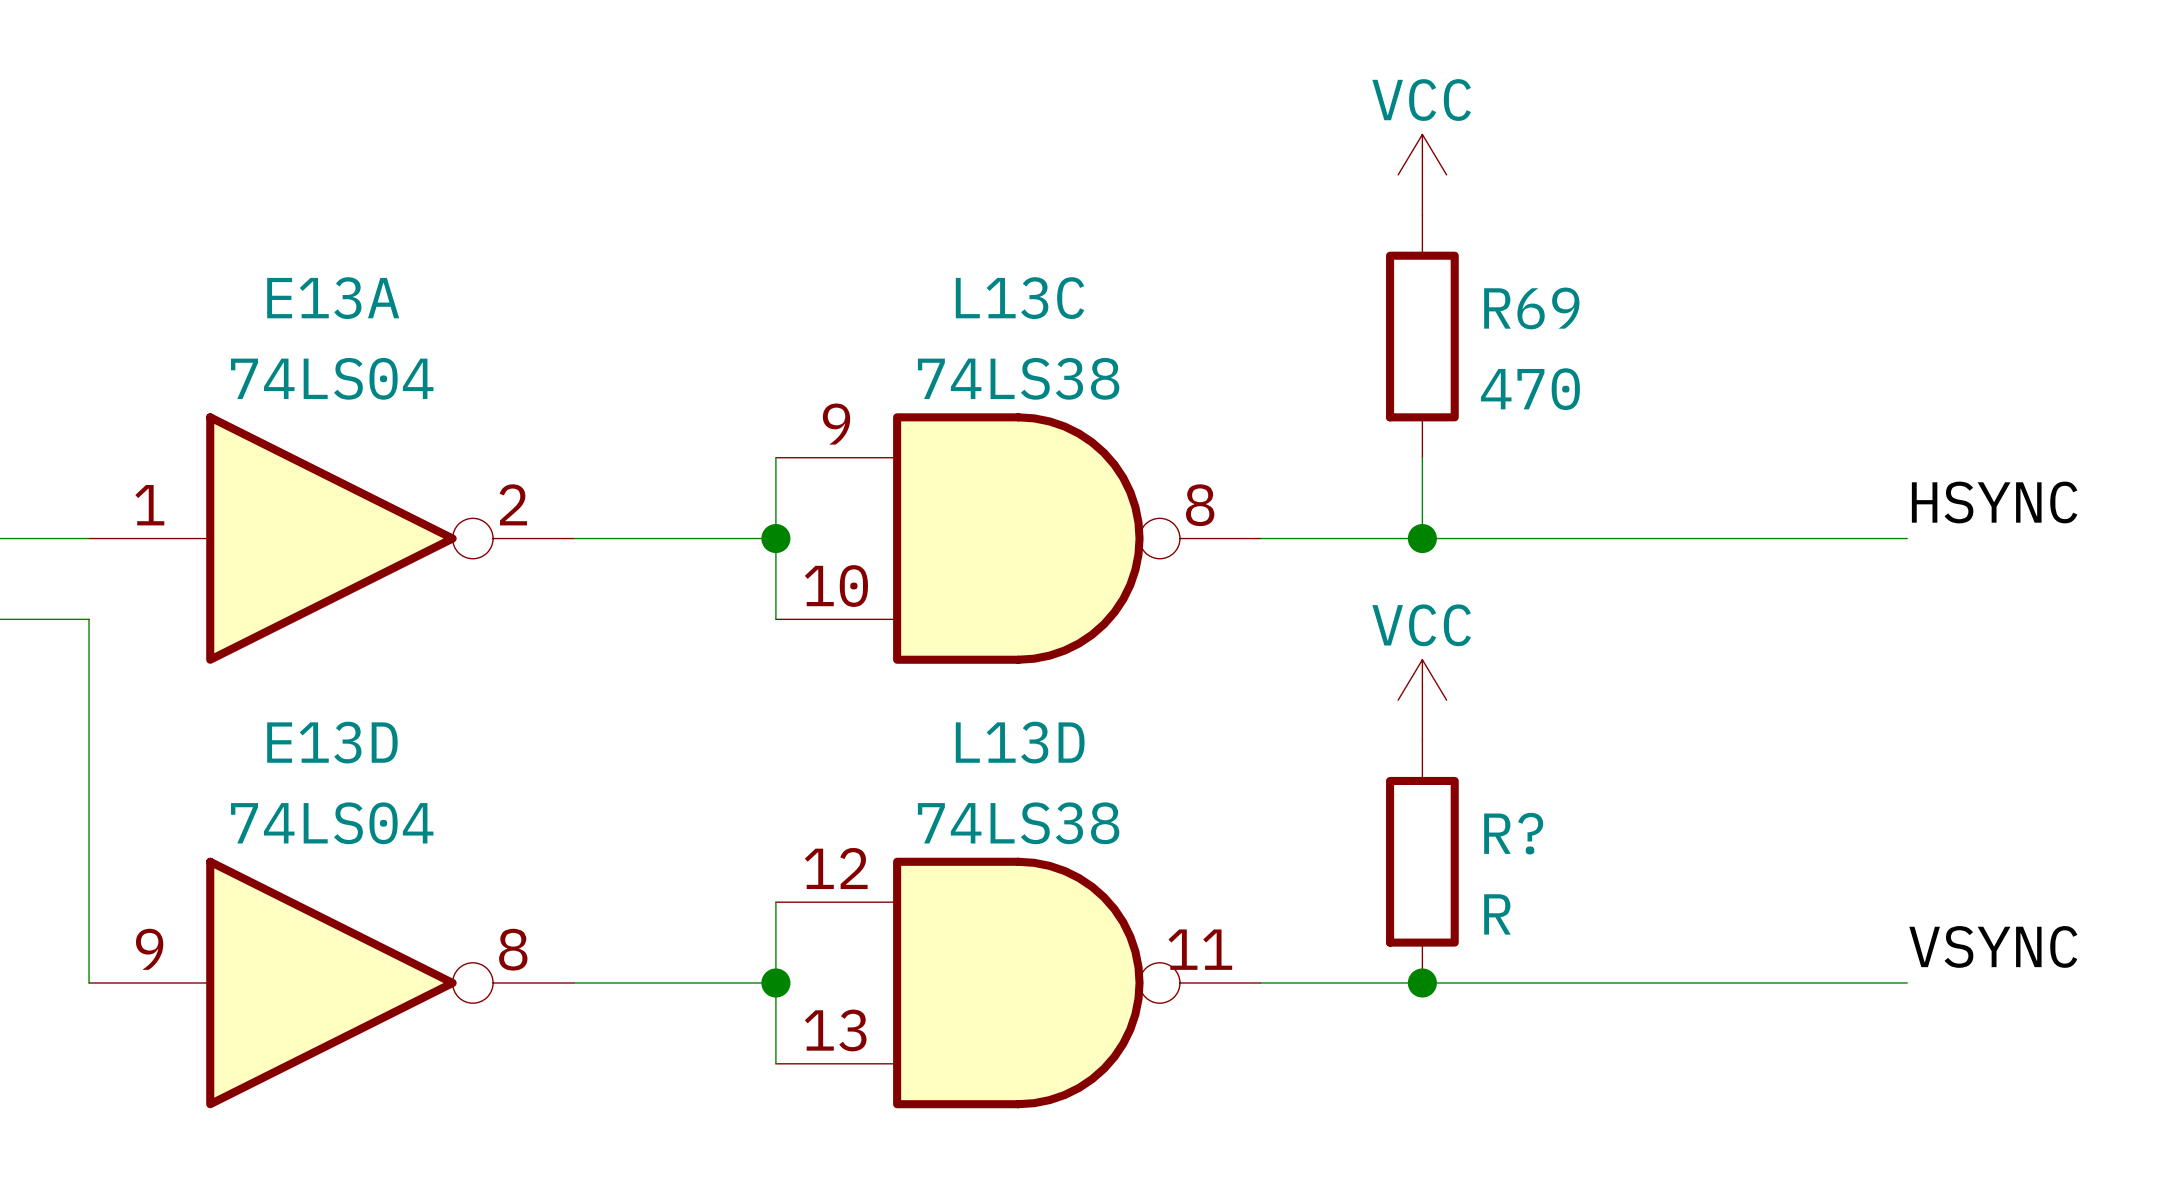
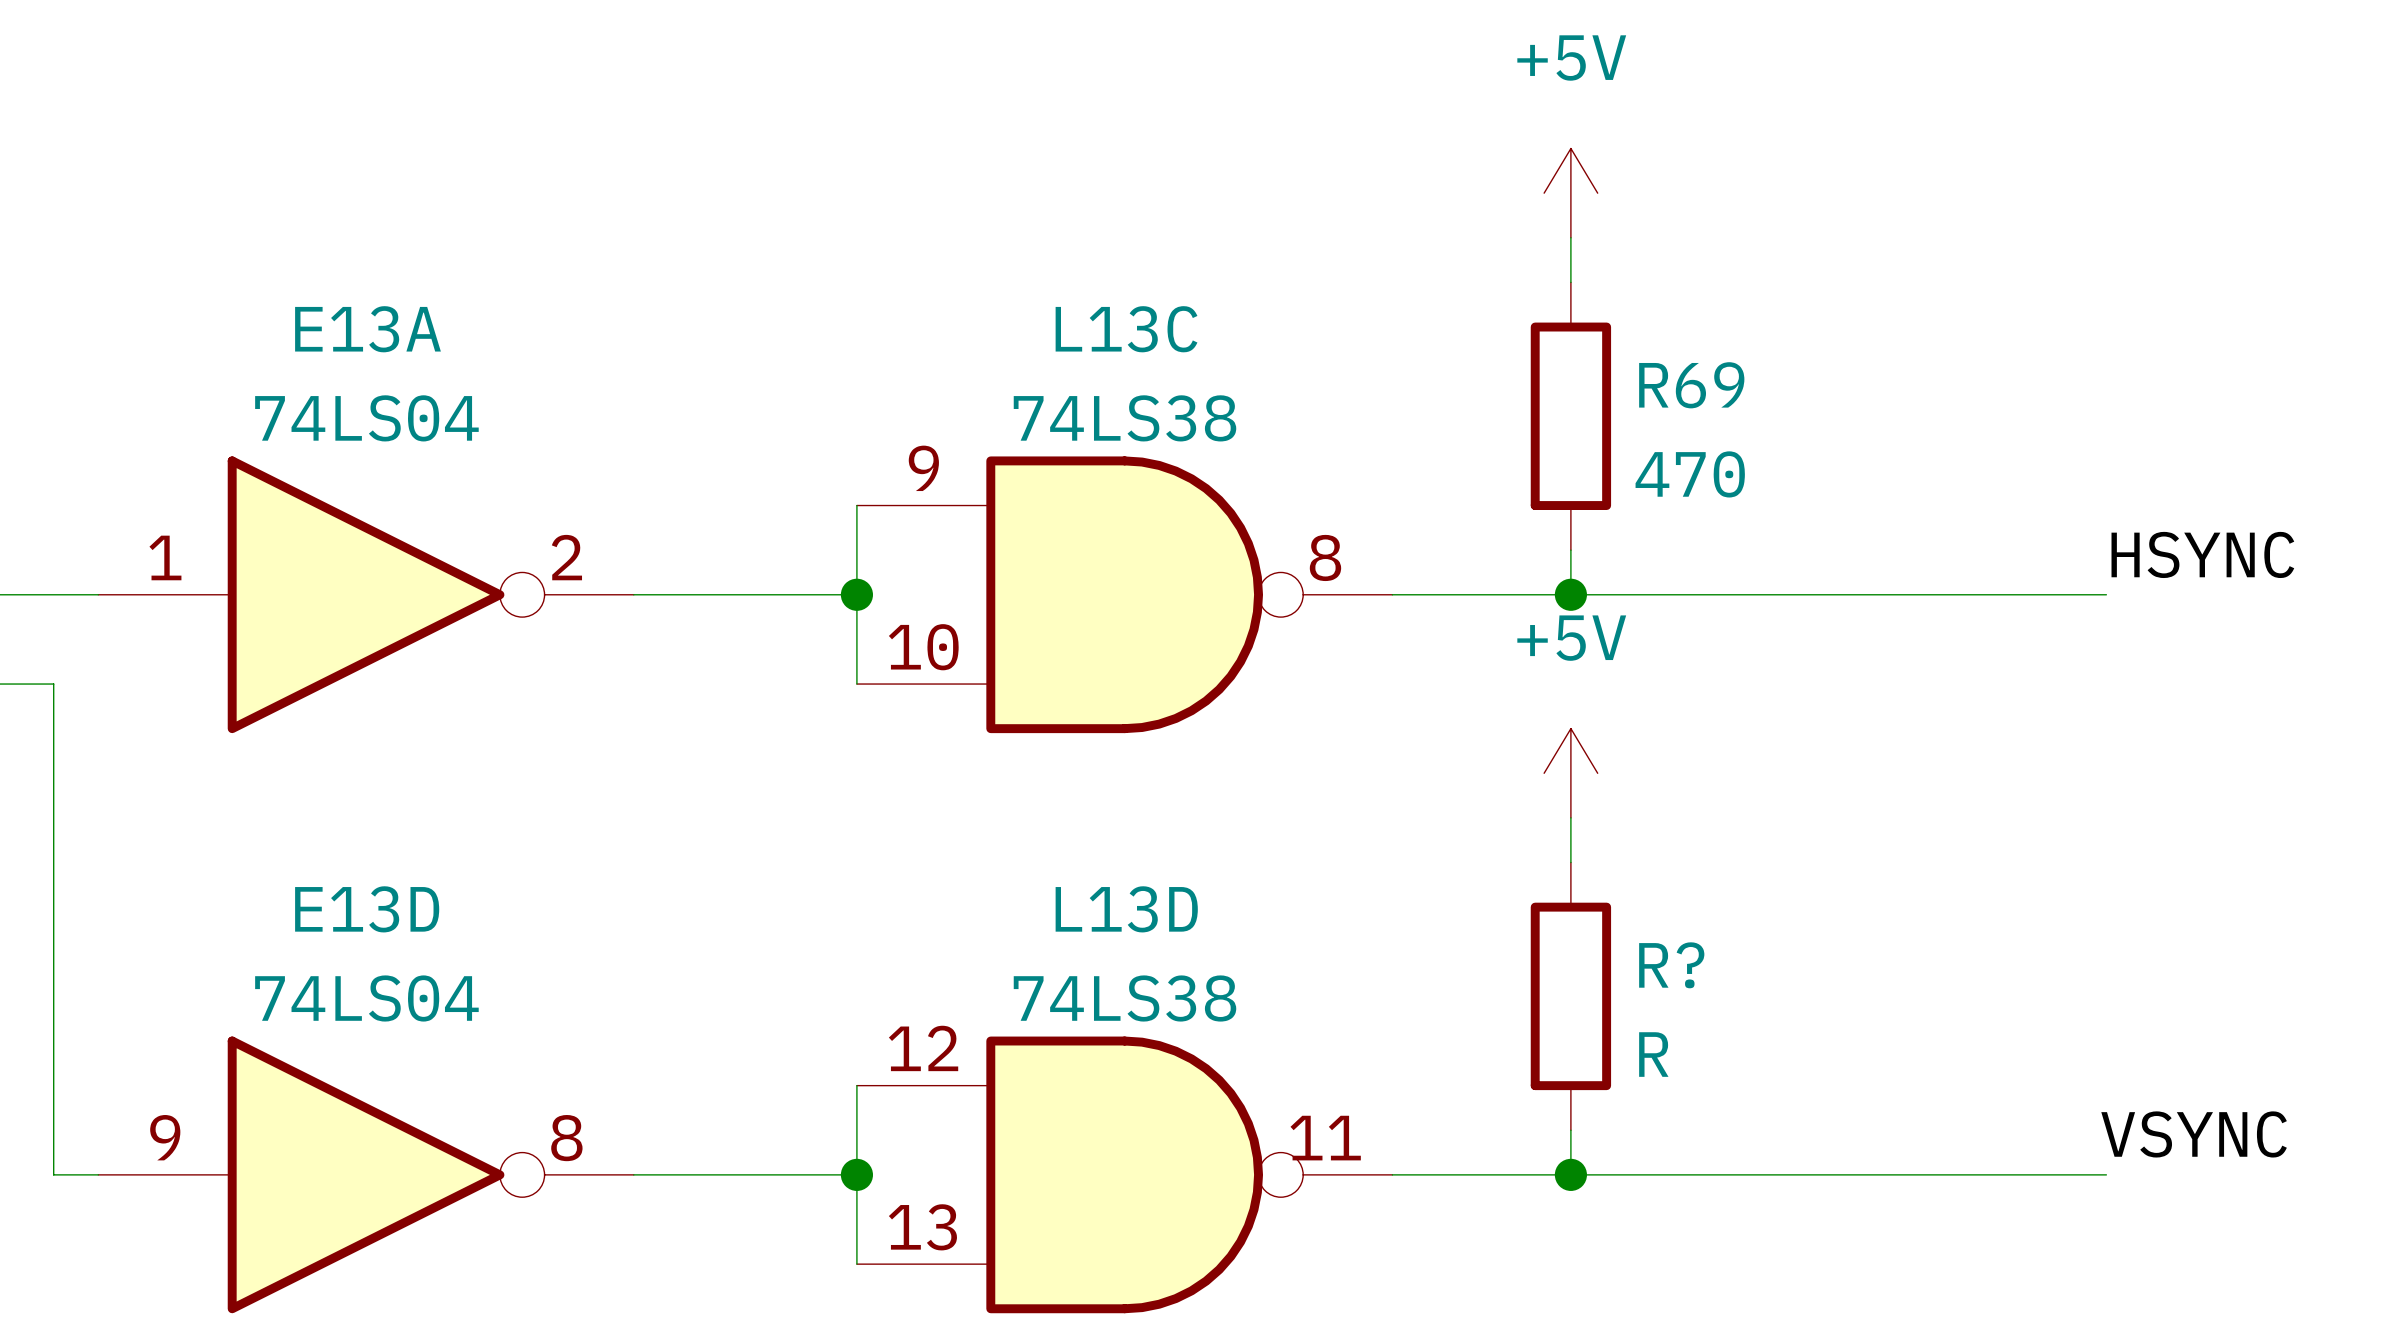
power symbol: VCC (1422, 174) -> +5V (1570, 193)
R69 position: (1422, 336) -> (1570, 416)
wire: (48, 619) (89, 619) (89, 982) -> (53, 684) (53, 1174) (98, 1174)
power symbol: VCC (1422, 700) -> +5V (1570, 773)
R? position: (1422, 861) -> (1570, 996)
wire: (775, 902) (775, 982) (573, 982) -> none
label position: VSYNC (1993, 946) -> VSYNC (2194, 1134)
E13D position: (331, 982) -> (366, 1174)
junction position: (775, 982) -> (856, 1174)
L13D position: (1018, 982) -> (1124, 1174)
wire: (1260, 982) (1907, 982) -> (1392, 1174) (2106, 1174)
junction position: (1422, 982) -> (1570, 1174)
wire: none -> (1570, 1130) (1570, 1174)
wire: none -> (633, 1174) (856, 1174) (856, 1264)

